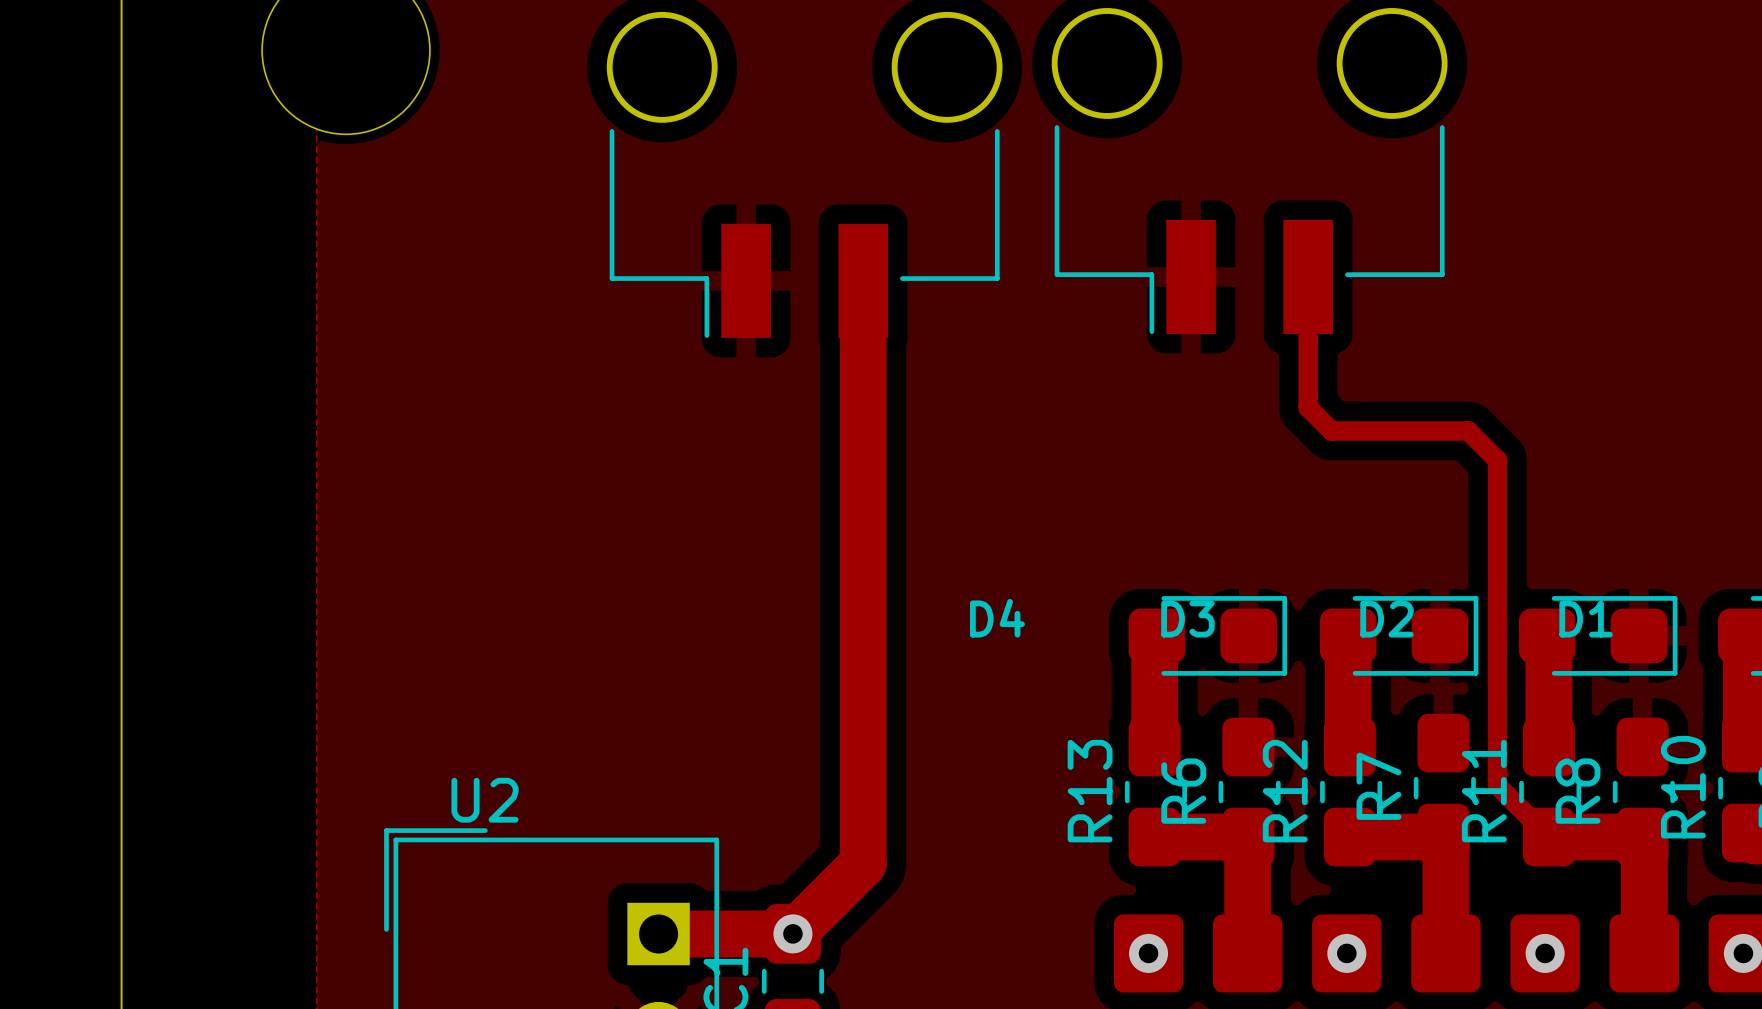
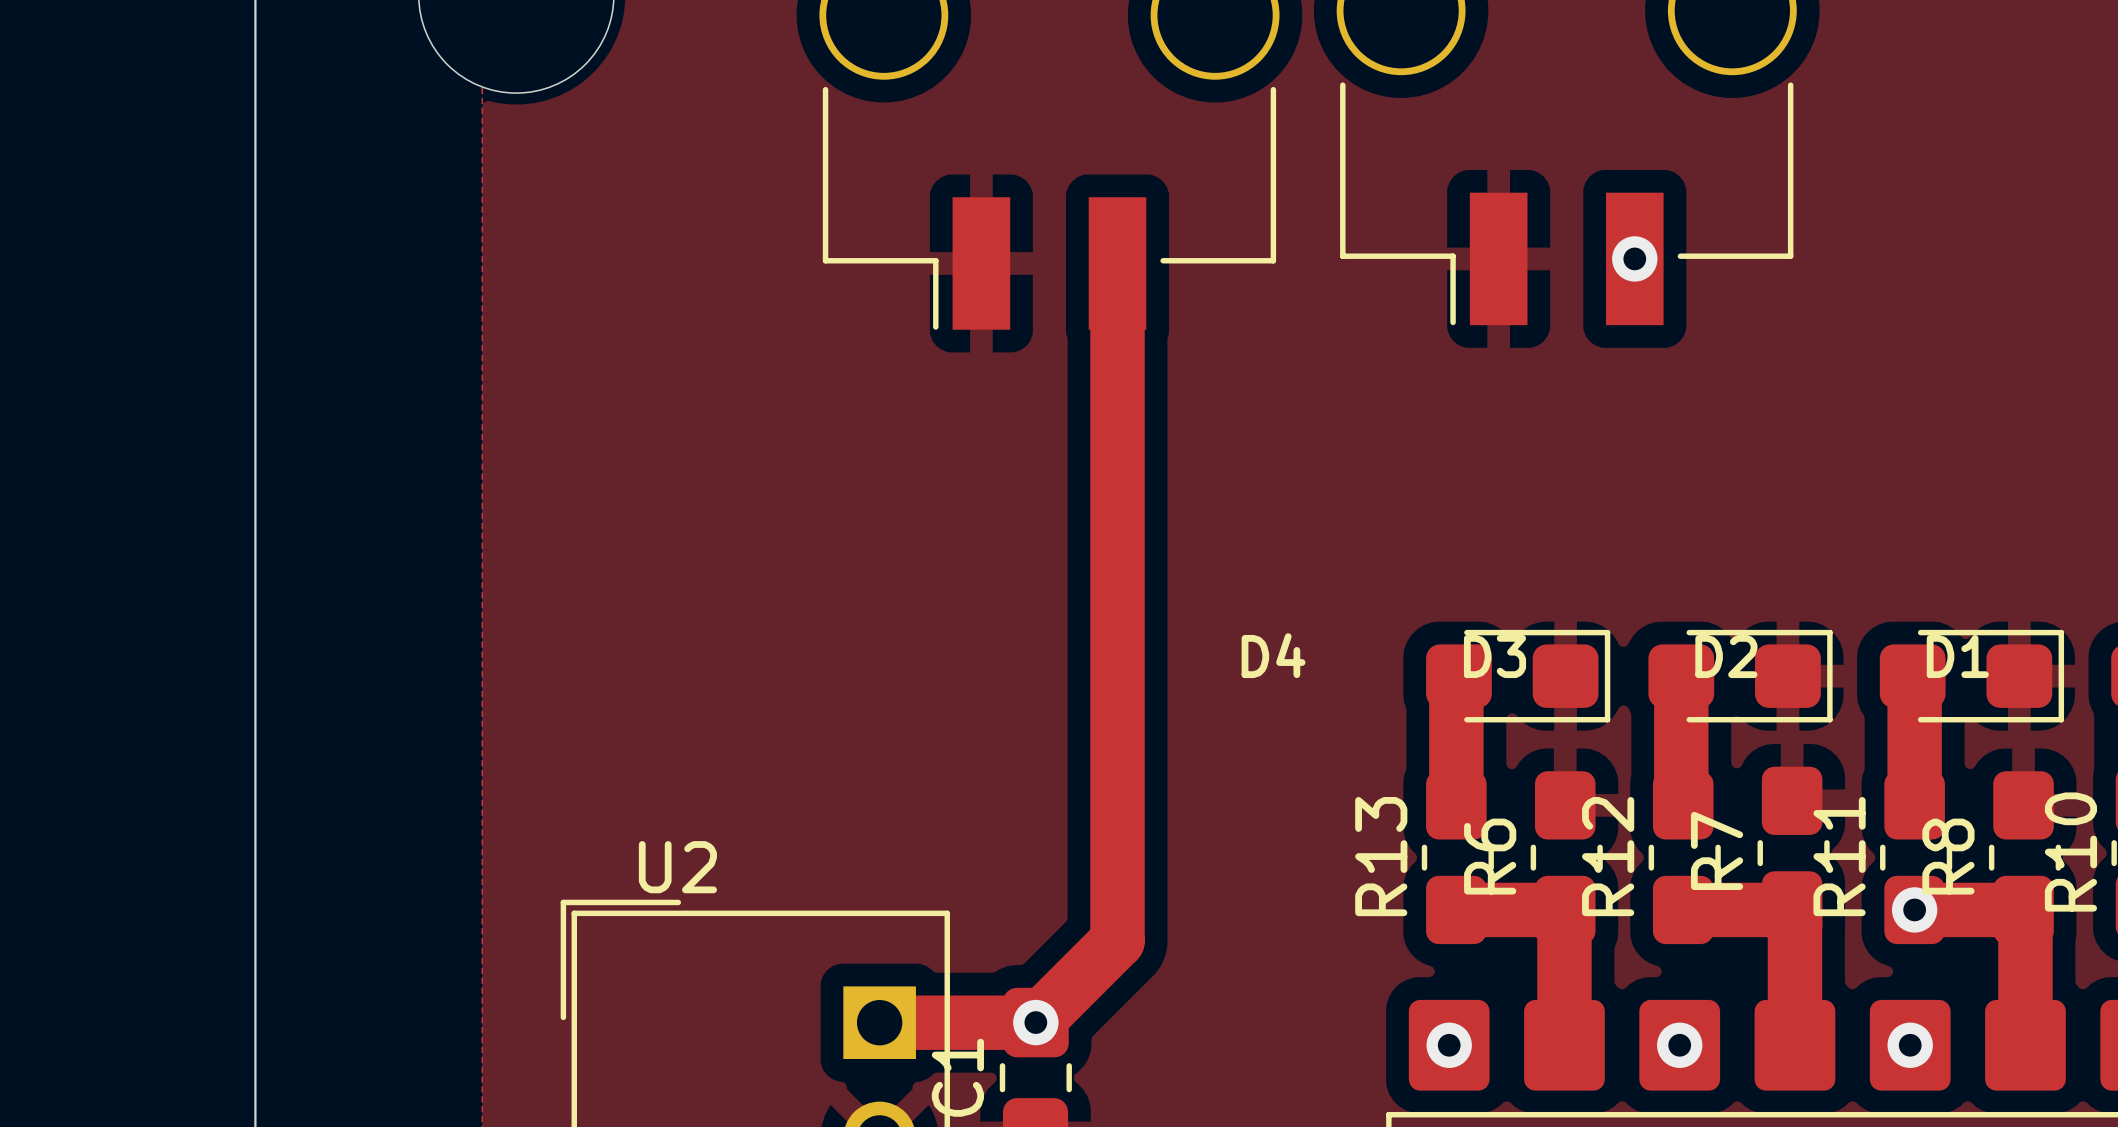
track: (1308, 276) (1308, 407) (1331, 430) (1468, 430) (1497, 460) (1497, 785) (1548, 837) -> none
via: none -> (1634, 258)
via: none -> (1914, 909)

